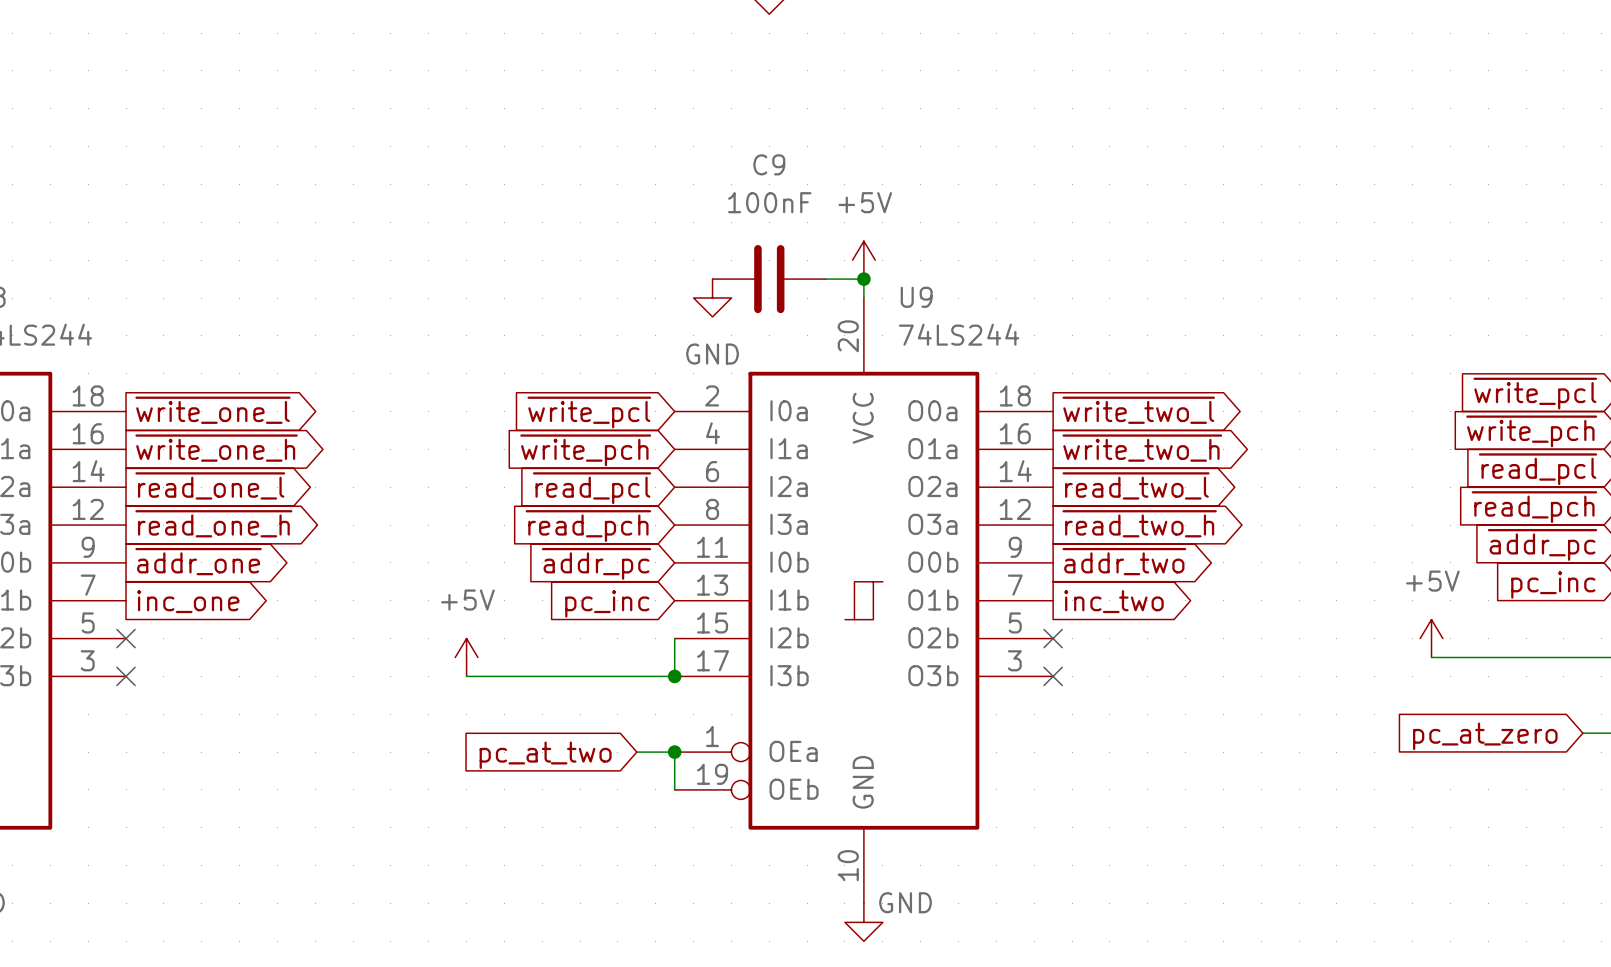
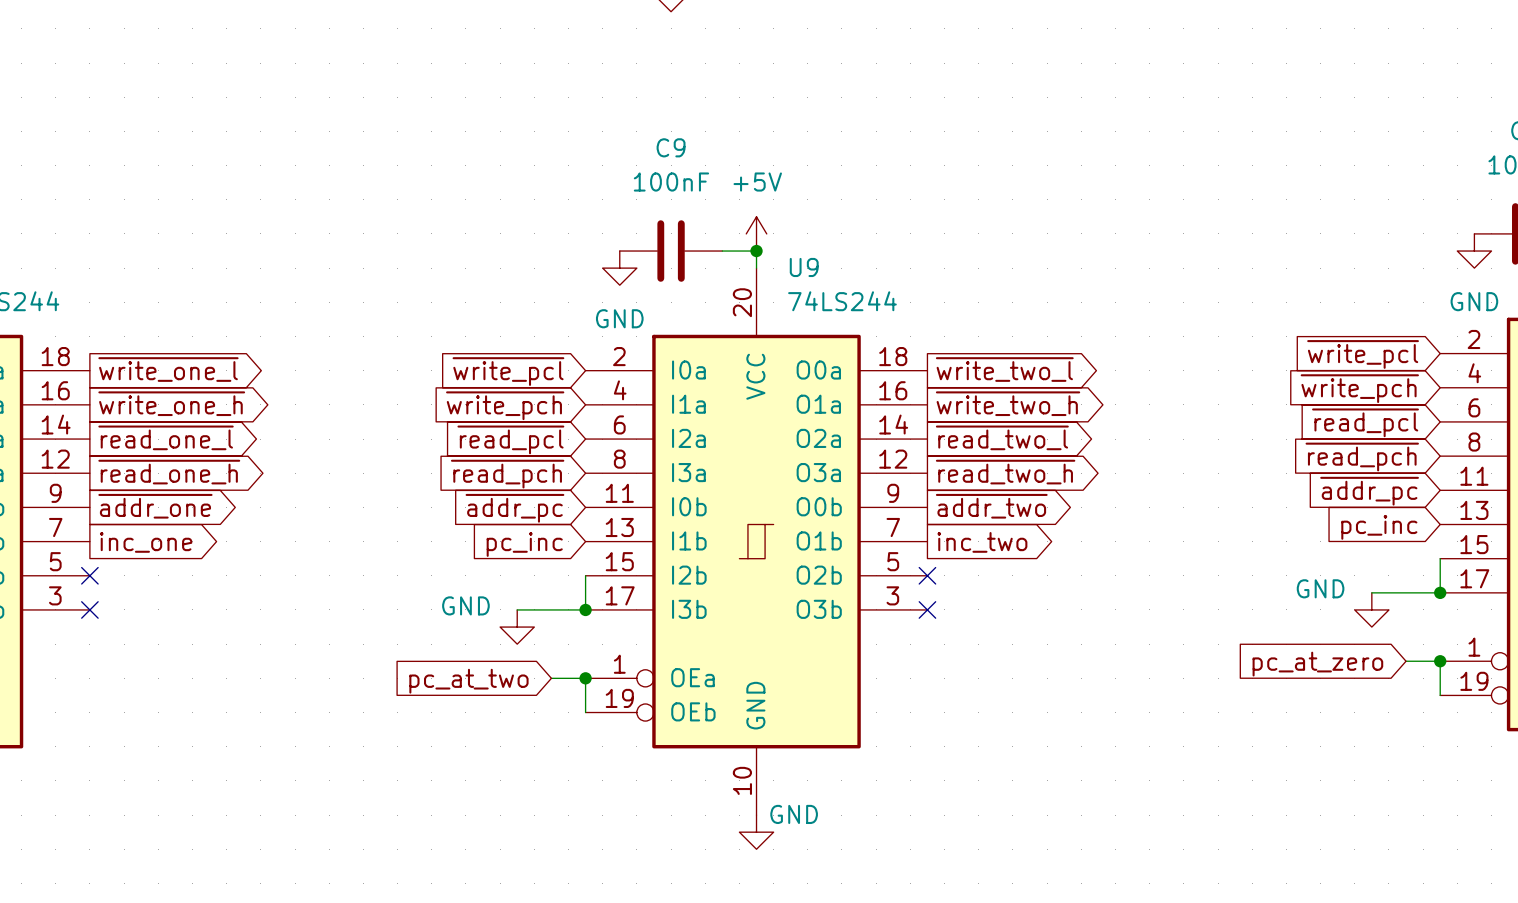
power symbol: +5V (1431, 638) -> none
power symbol: +5V (466, 657) -> none
wire: (1431, 657) (1545, 657) -> none
wire: (466, 676) (599, 676) -> none
power symbol: none -> GND (1371, 609)
power symbol: none -> GND (517, 627)

